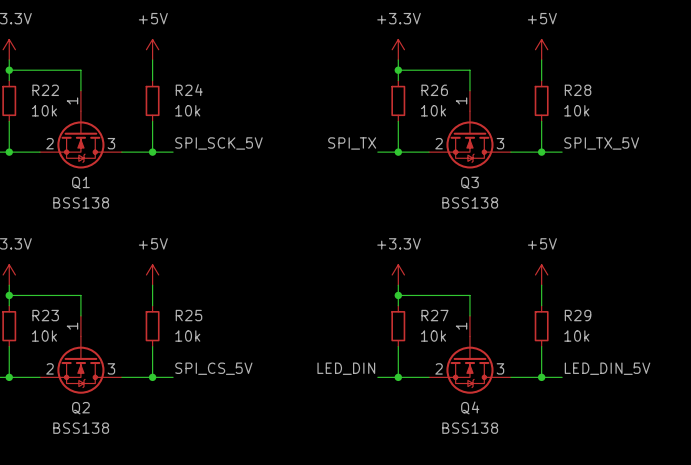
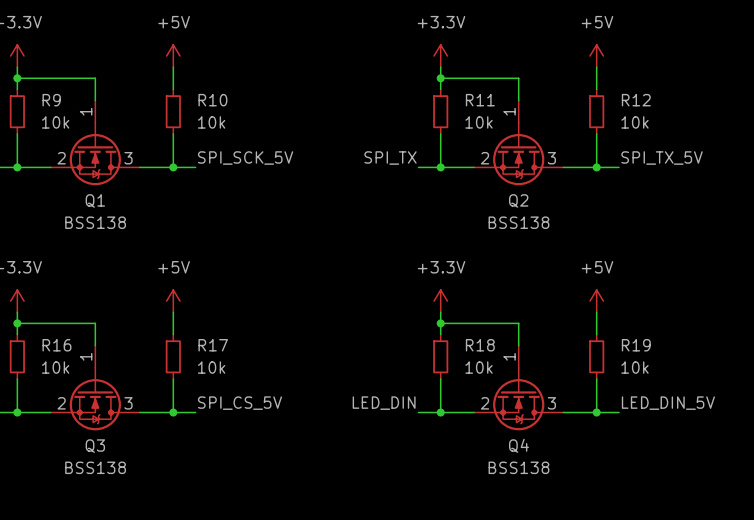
R22 name: R22 (45, 90) -> R9 (51, 100)
R24 name: R24 (189, 90) -> R10 (212, 100)
R26 name: R26 (434, 90) -> R11 (480, 100)
R28 name: R28 (578, 90) -> R12 (636, 100)
Q3 name: Q3 (469, 182) -> Q2 (518, 200)
R23 name: R23 (45, 315) -> R16 (56, 345)
R25 name: R25 (188, 315) -> R17 (213, 345)
R27 name: R27 (434, 315) -> R18 (480, 345)
R29 name: R29 (578, 315) -> R19 (636, 345)
Q2 name: Q2 (80, 408) -> Q3 (95, 446)

